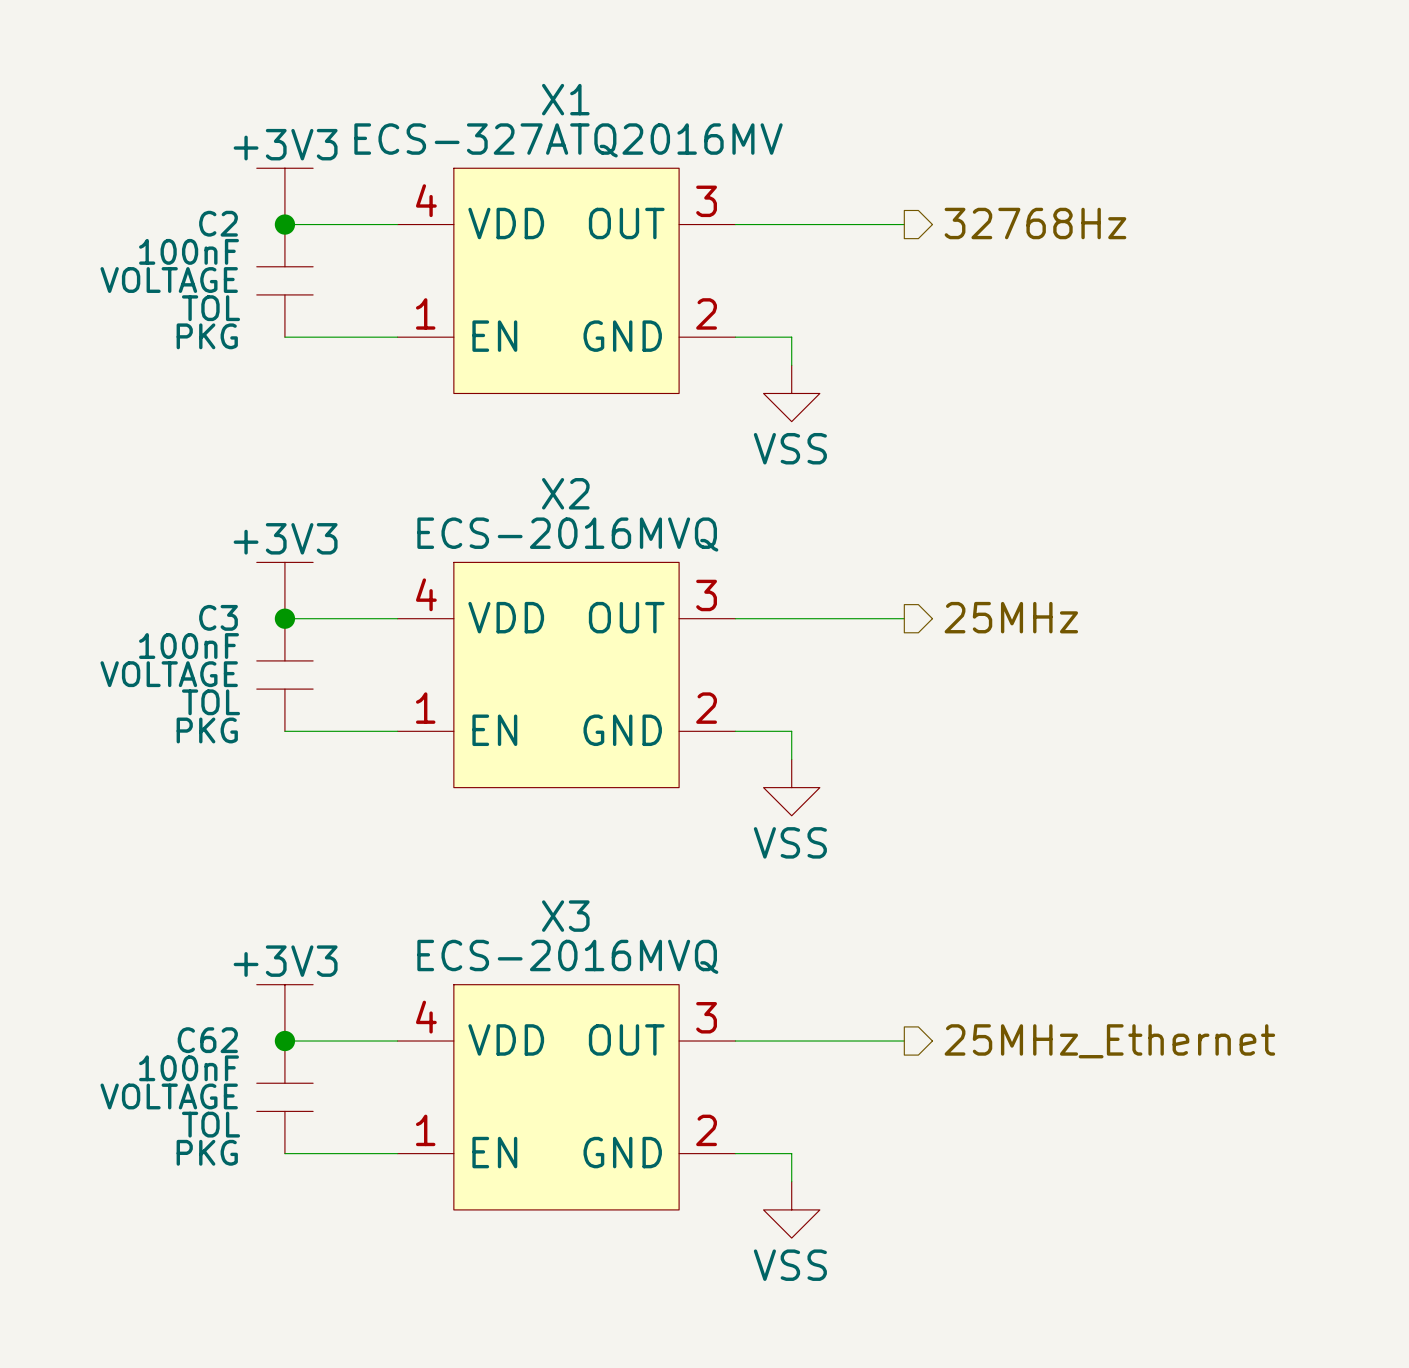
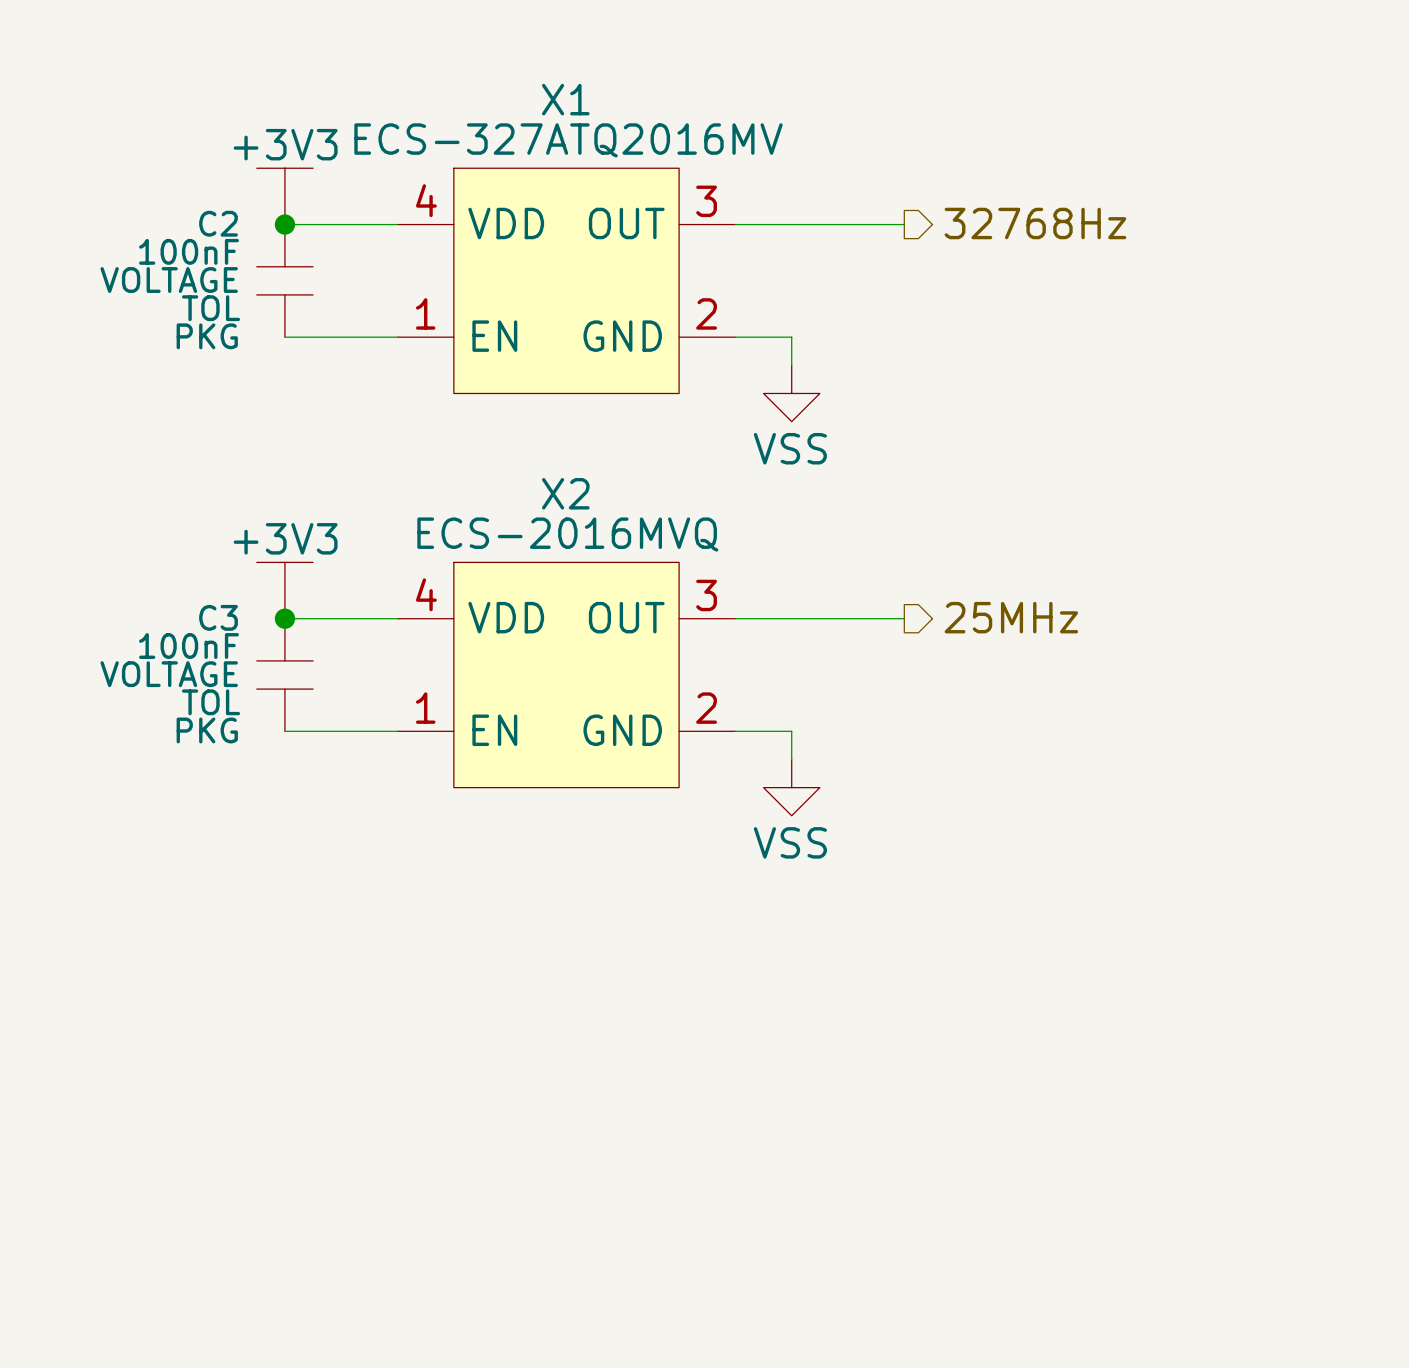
power symbol: +3V3 (284, 1012) -> none
wire: (284, 1041) (397, 1041) -> none
junction: (284, 1041) -> none
wire: (735, 1041) (904, 1041) -> none
hierarchical label: 25MHz_Ethernet (1109, 1041) -> none
C62: 100nF (284, 1097) -> none
X3: ECS-2016MVQ (566, 1097) -> none
wire: (284, 1153) (397, 1153) -> none
wire: (735, 1153) (791, 1153) (791, 1181) -> none
power symbol: VSS (791, 1209) -> none

